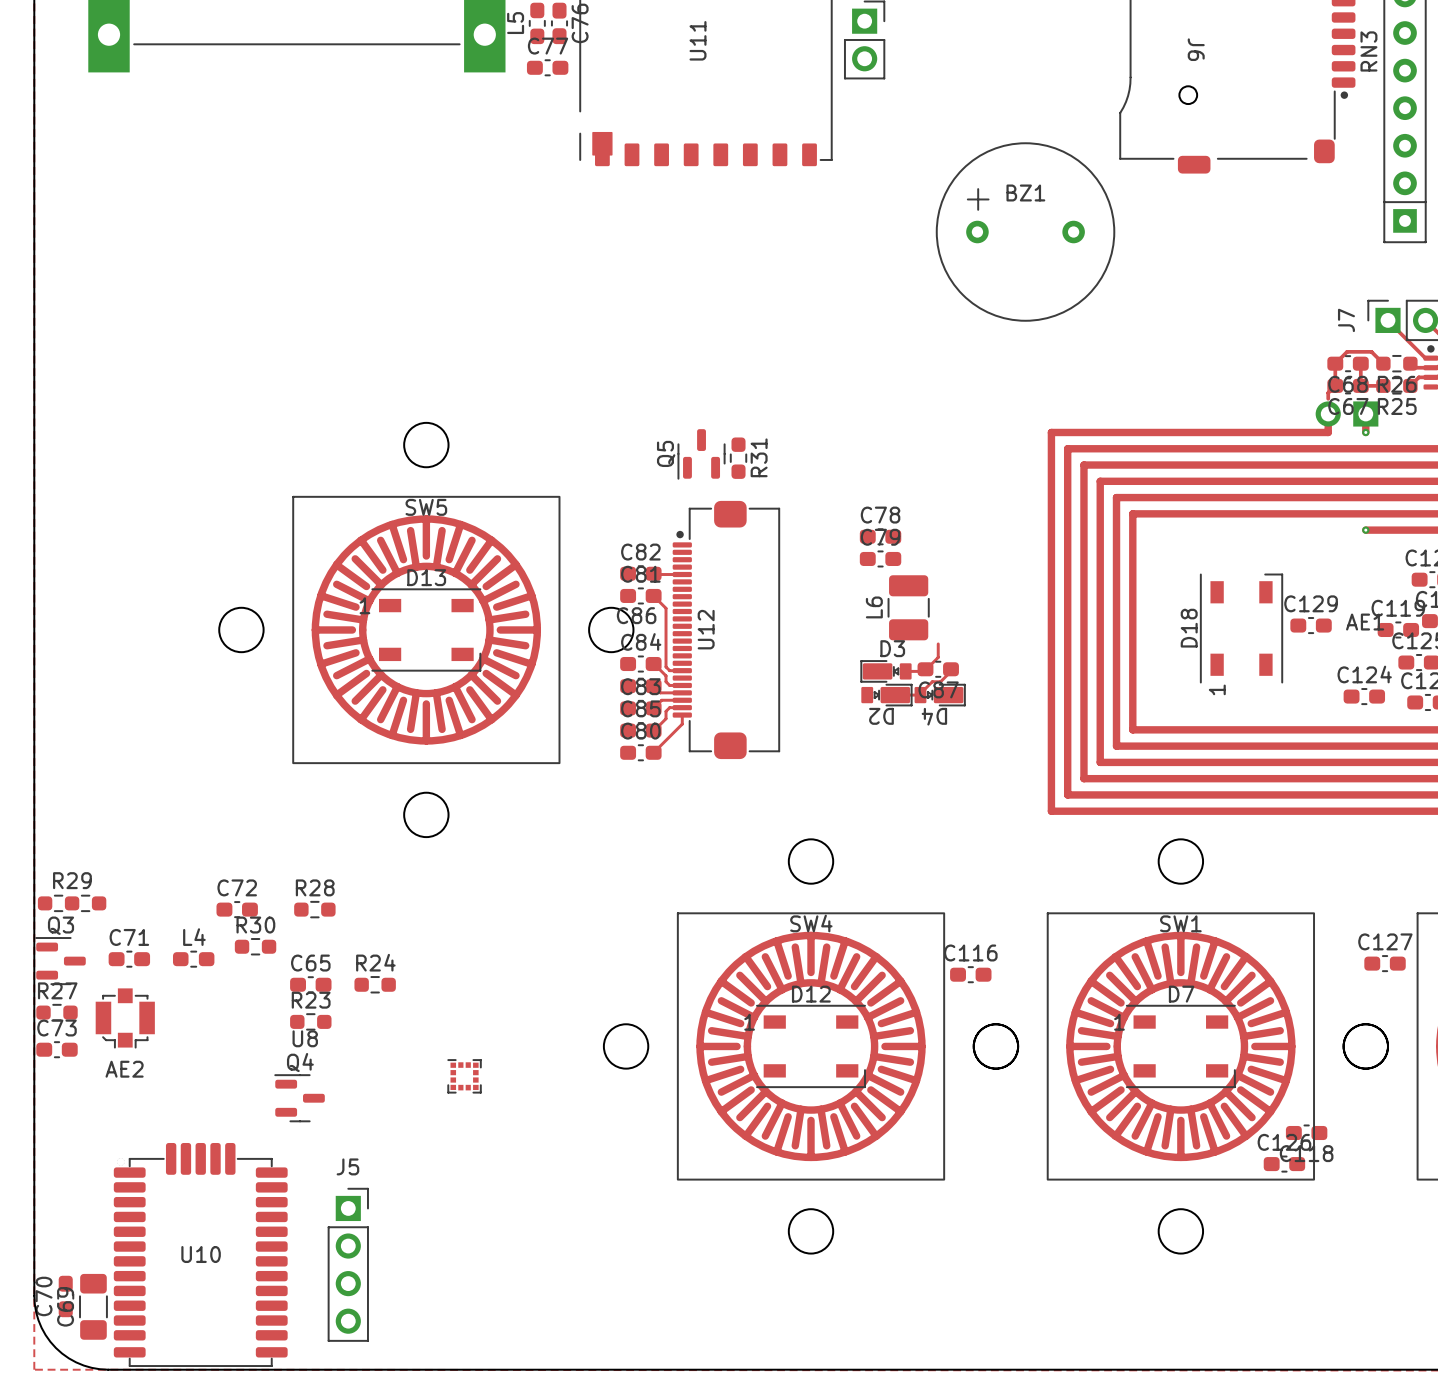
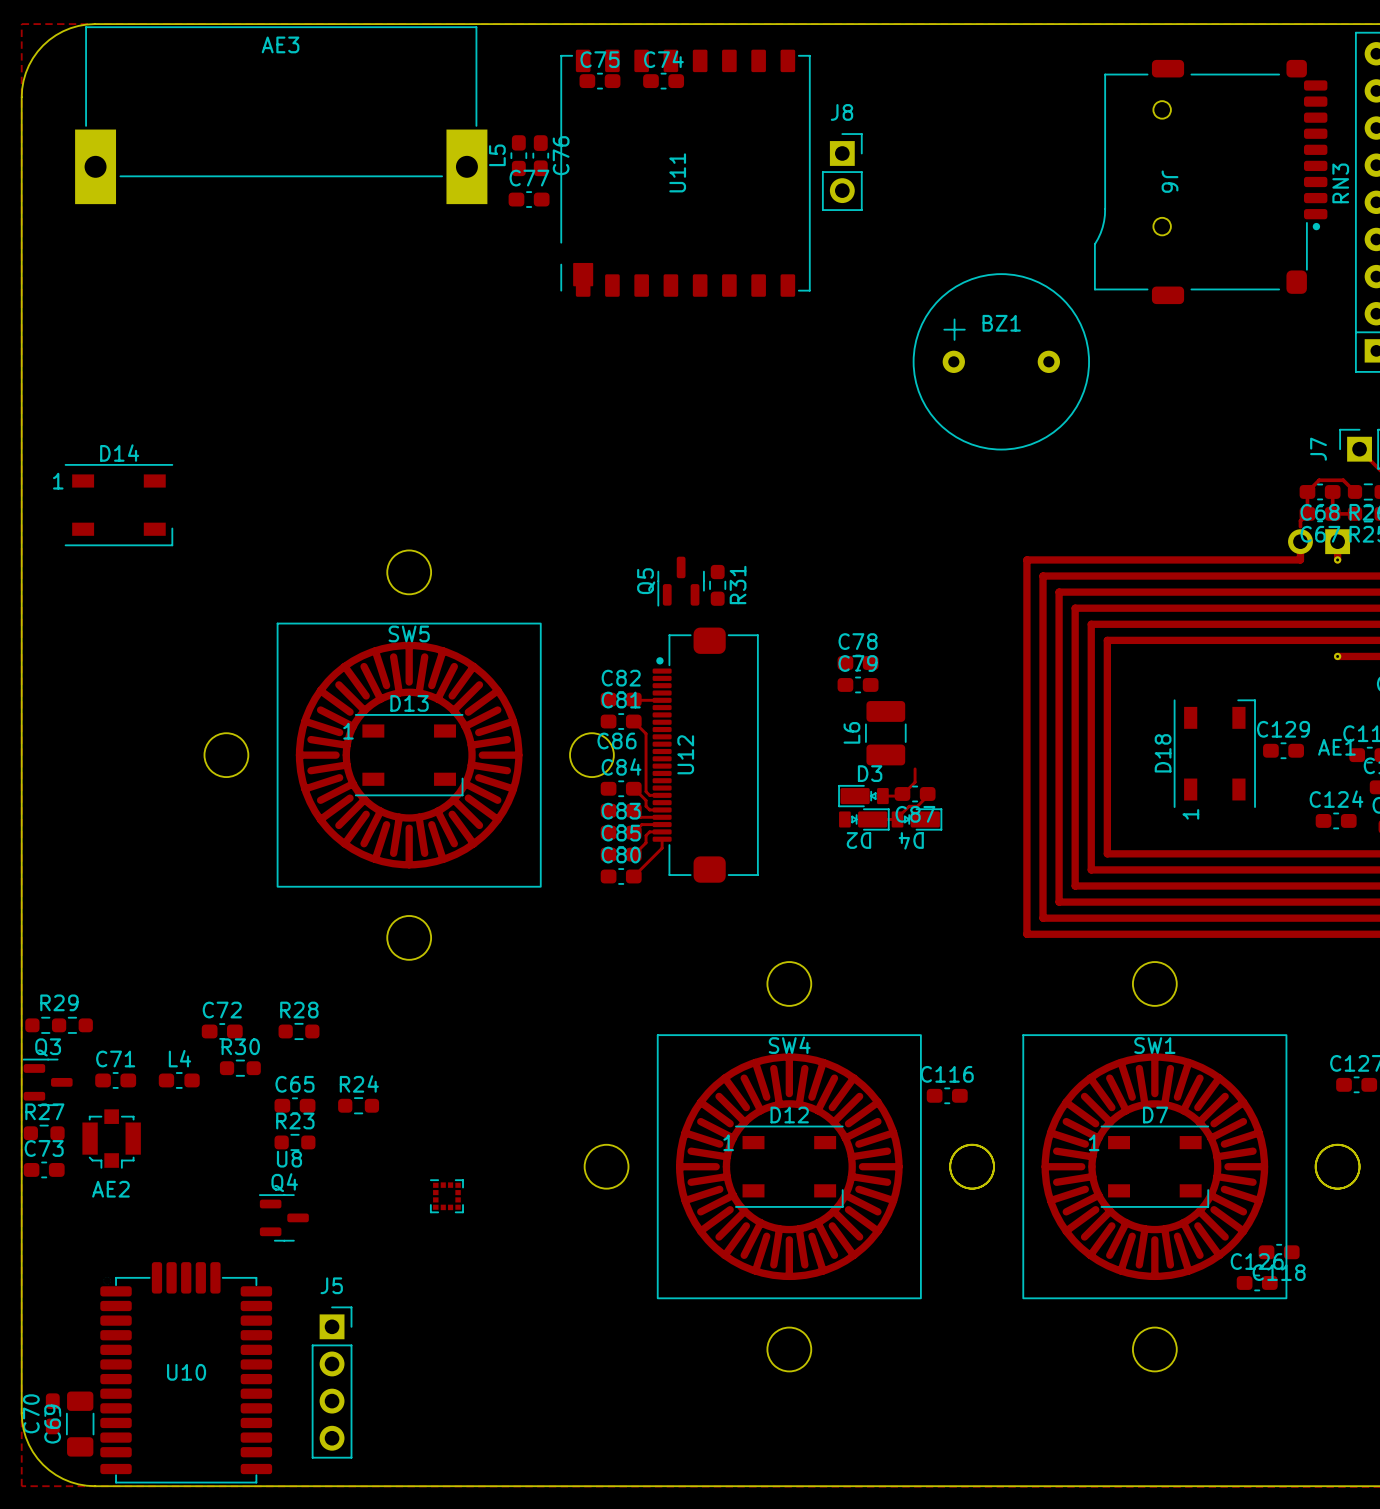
D14: none -> (118, 505)

